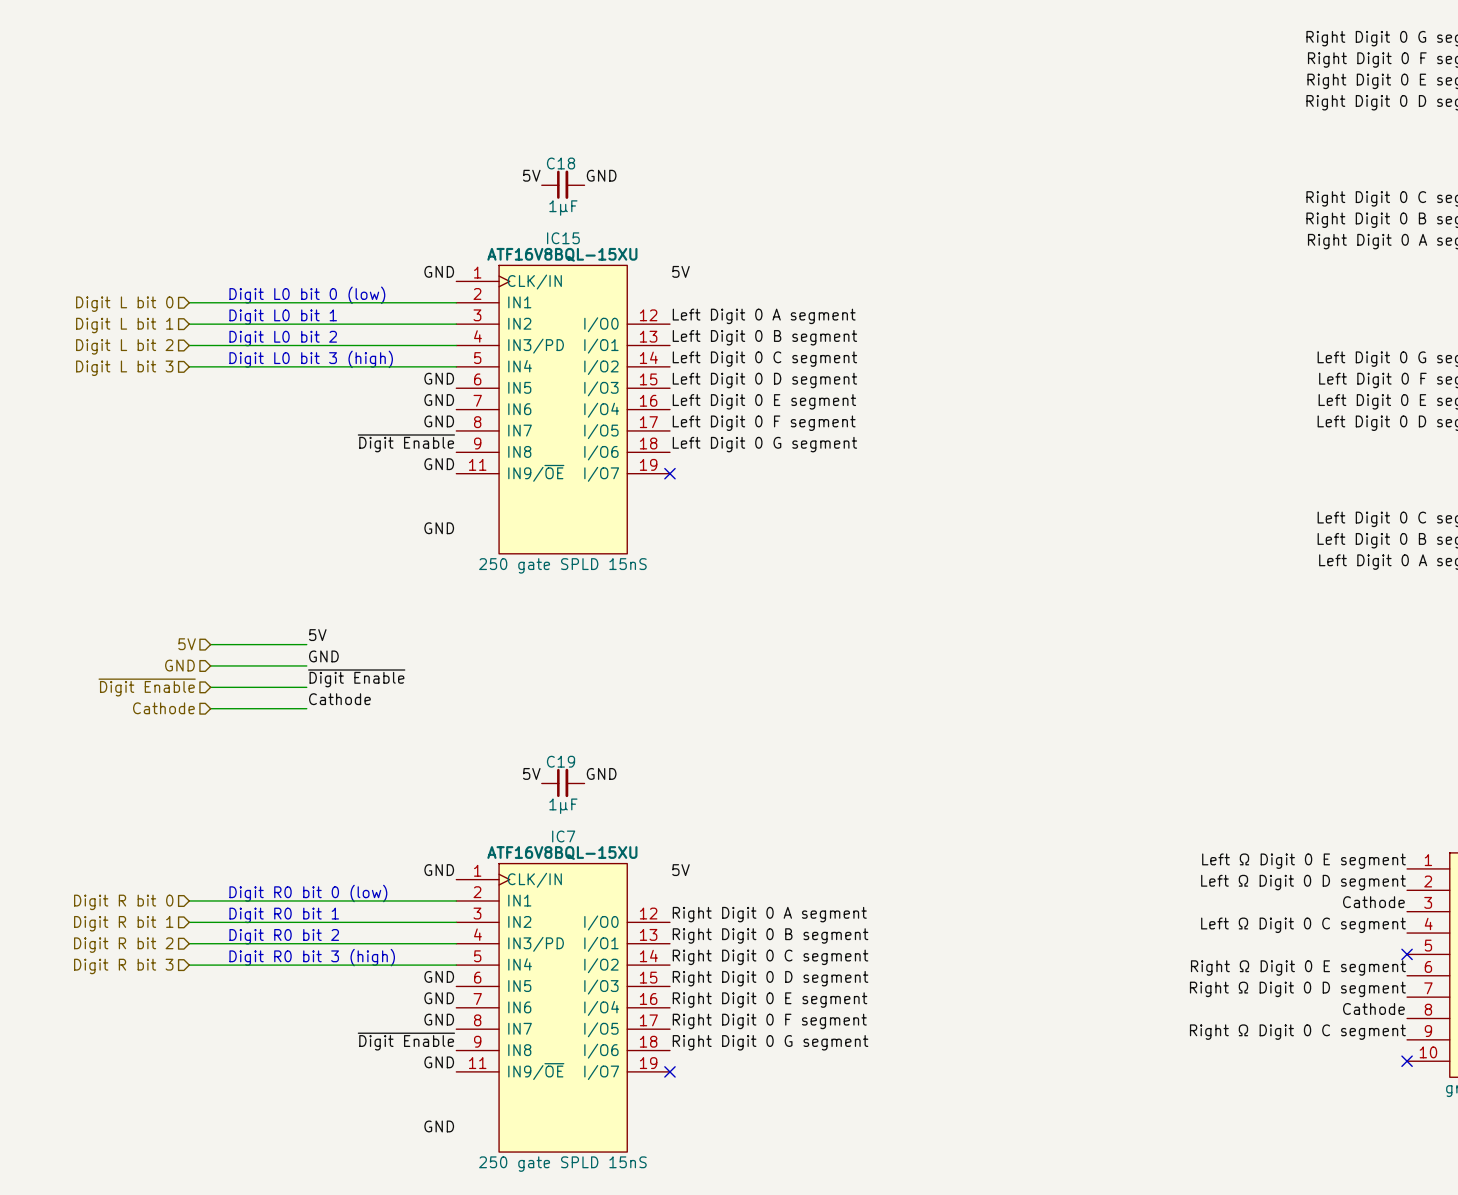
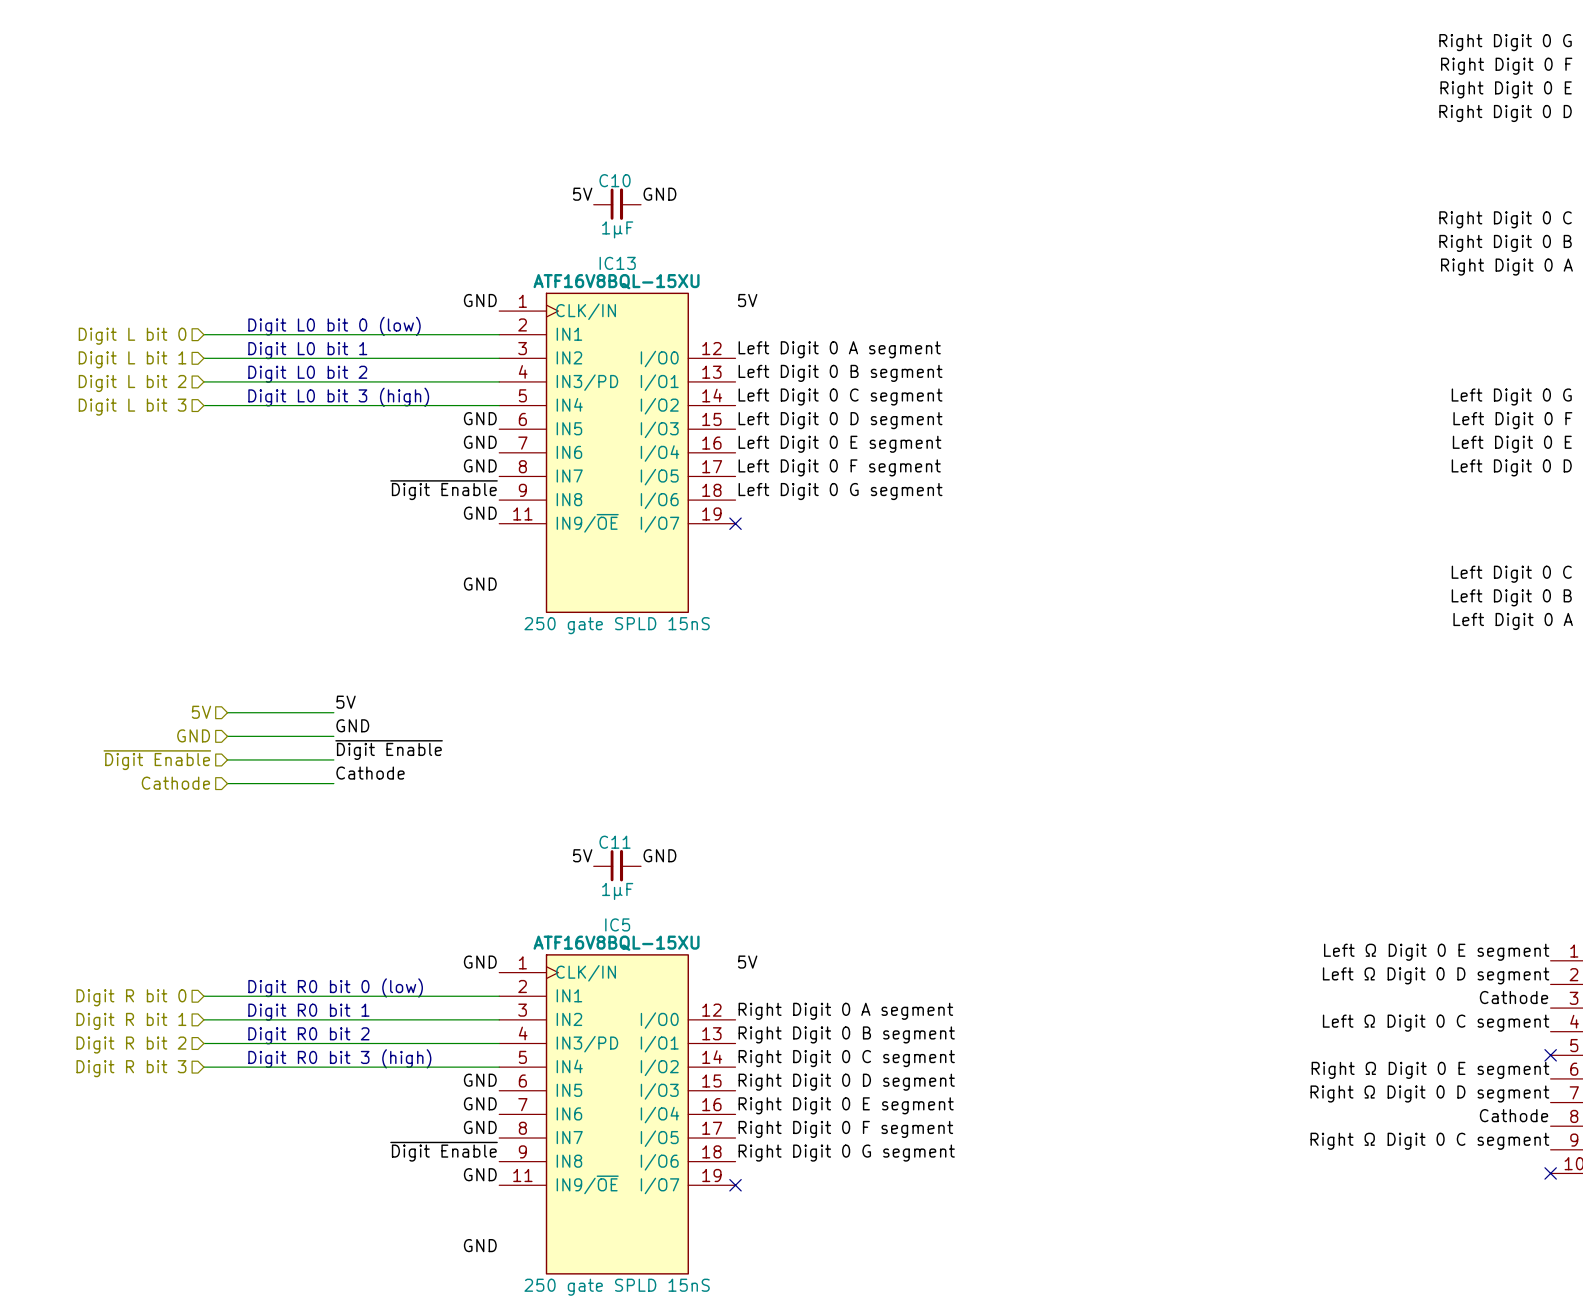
C18 name: C18 (561, 163) -> C10 (615, 180)
IC15 name: IC15 (563, 238) -> IC13 (617, 263)
C19 name: C19 (561, 761) -> C11 (615, 842)
IC7 name: IC7 (563, 836) -> IC5 (617, 924)

